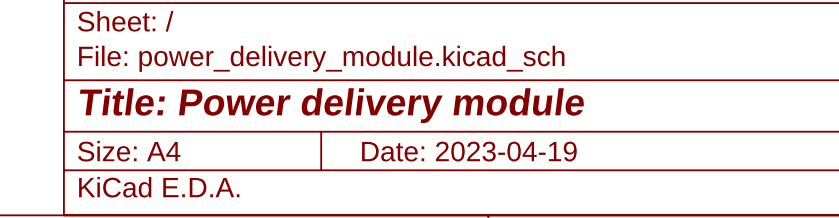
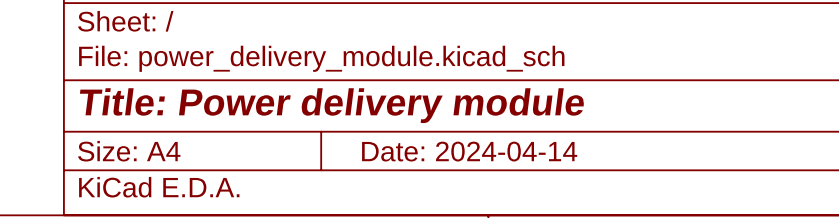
title block: Date: 2023-04-19 (469, 151) -> Date: 2024-04-14 (469, 151)

